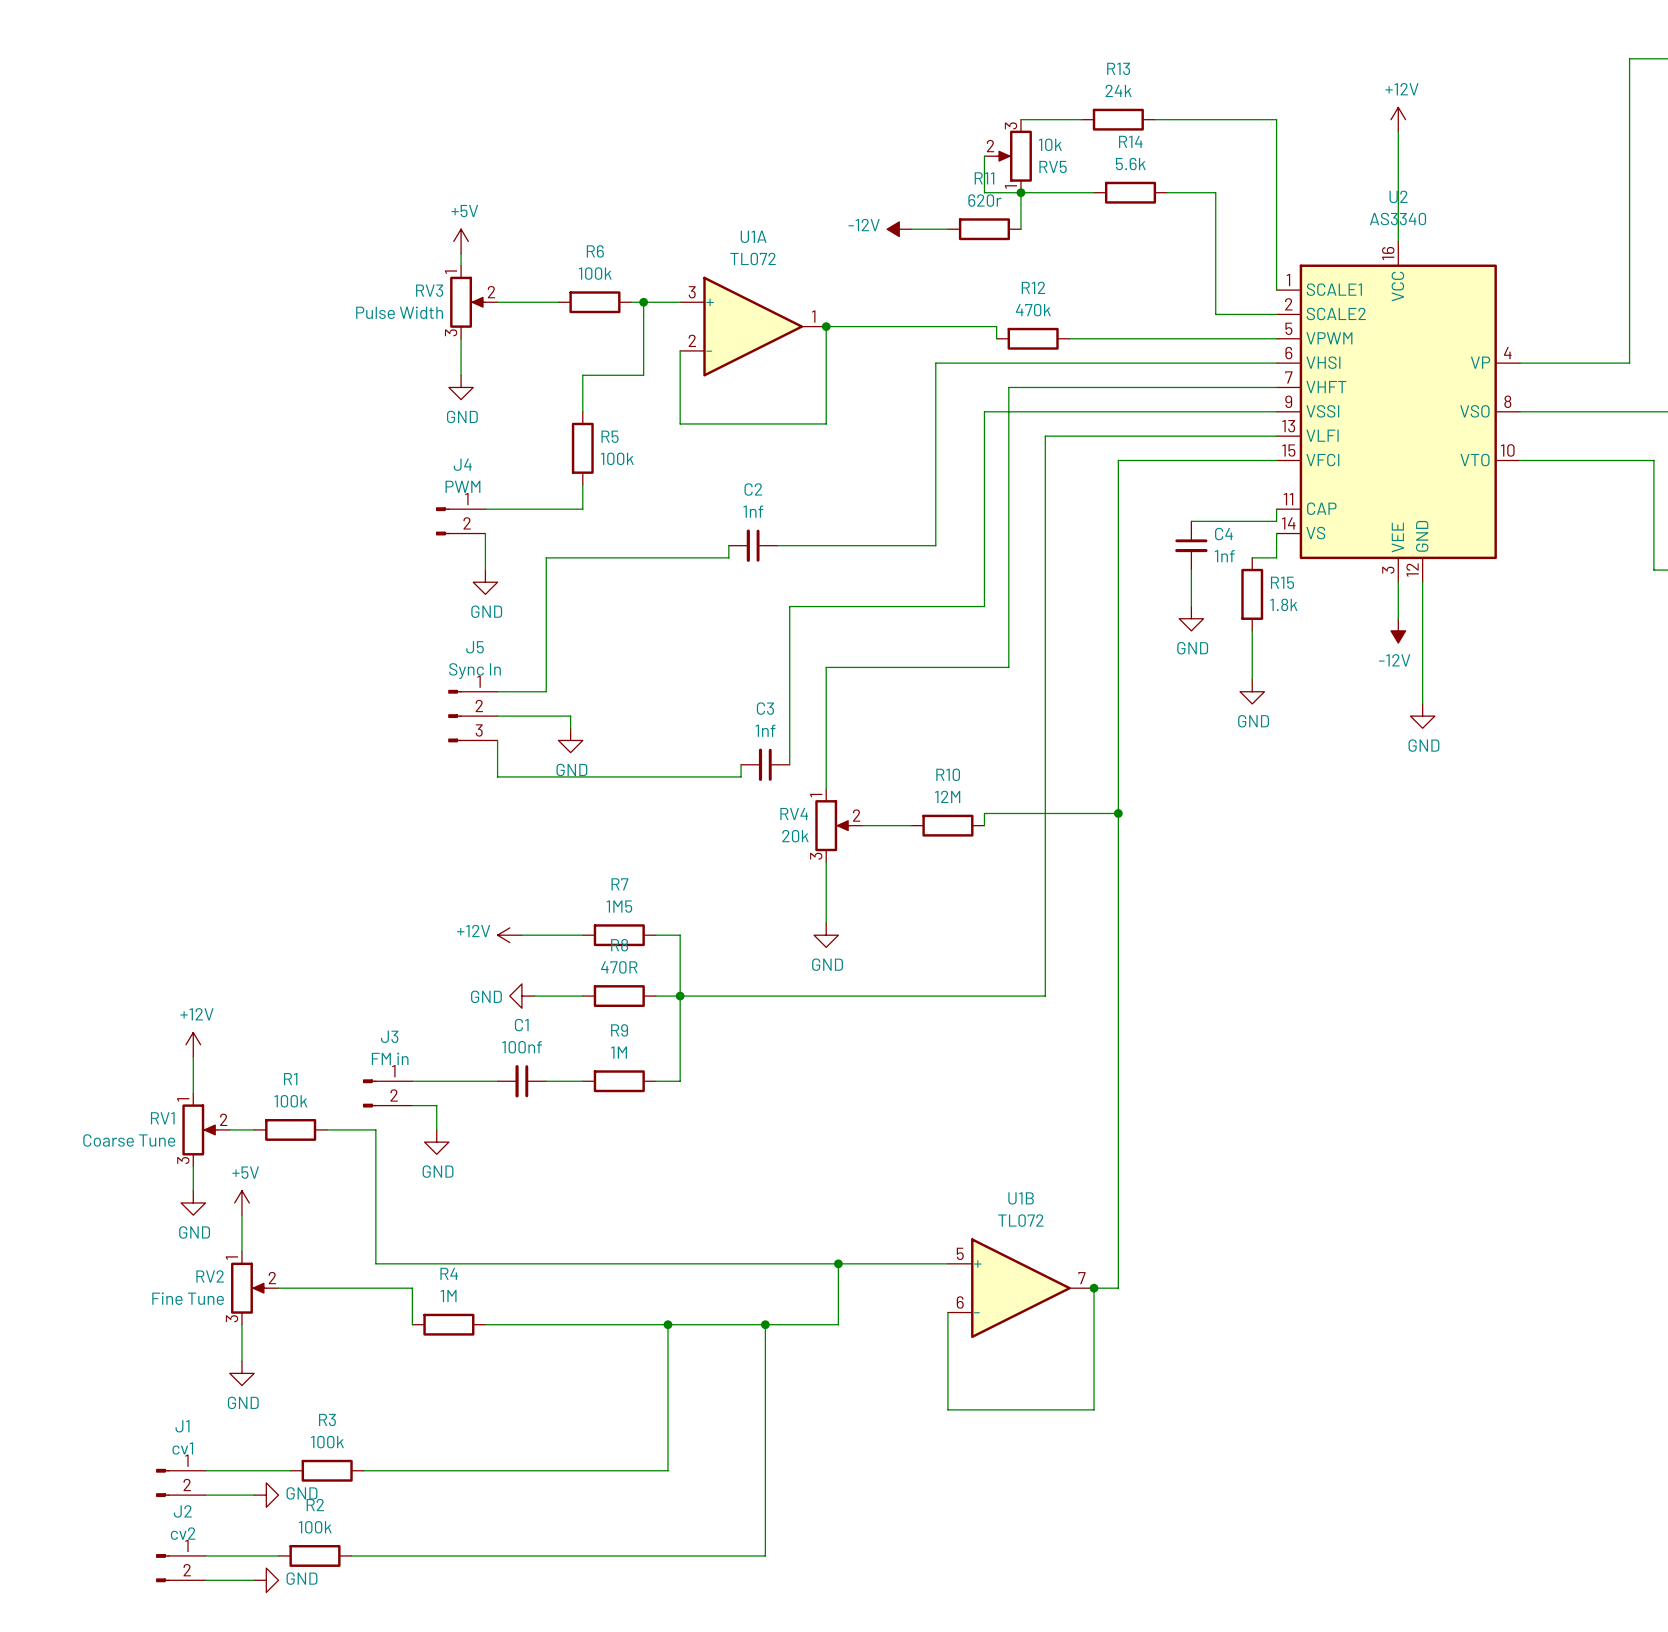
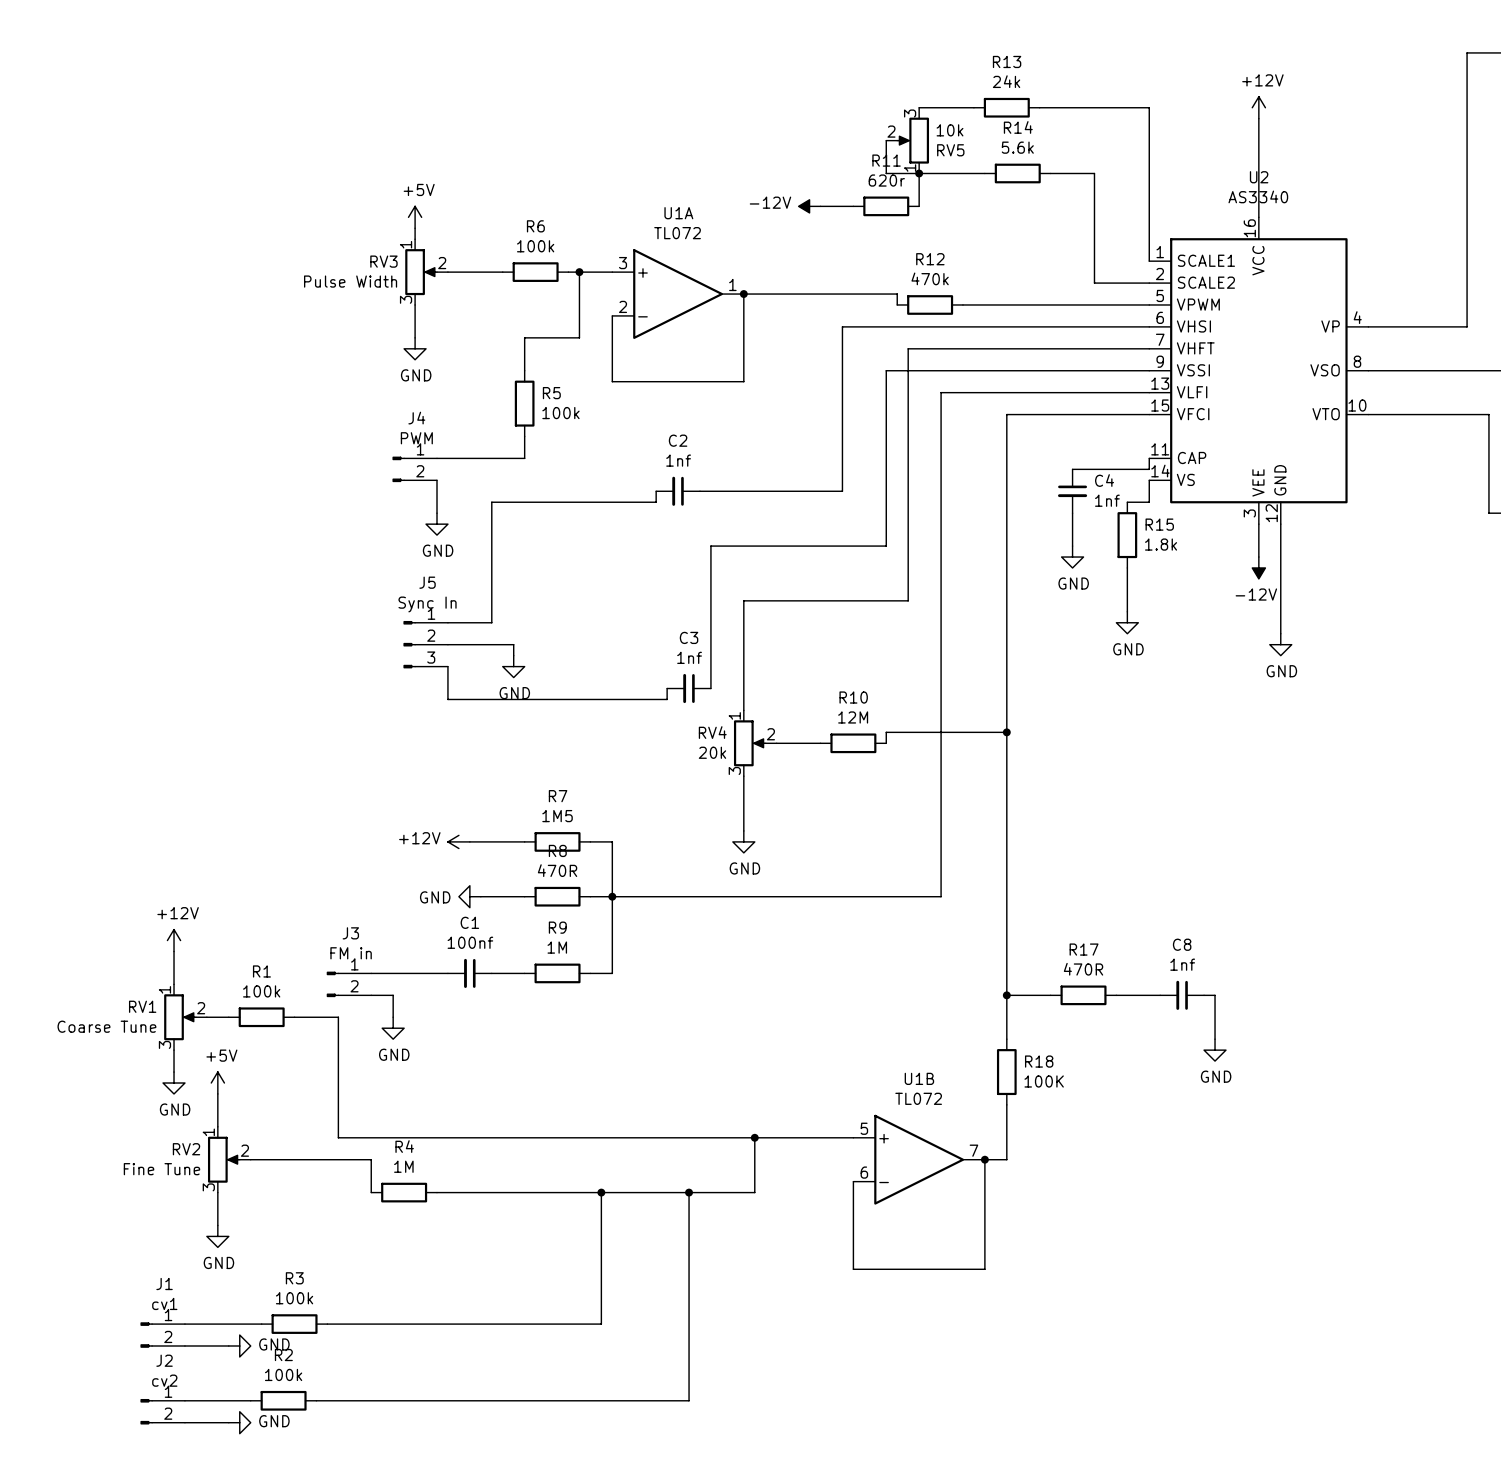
wire: none -> (1006, 995) (1050, 995)
junction: none -> (1006, 995)
R17: none -> 470R (1083, 995)
wire: none -> (1116, 995) (1160, 995)
C8: none -> 1nf (1182, 995)
wire: none -> (1204, 995) (1215, 995) (1215, 1039)
wire: (1118, 1154) (1118, 1227) -> none
power symbol: none -> GND (1215, 1050)
R18: none -> 100K (1006, 1072)

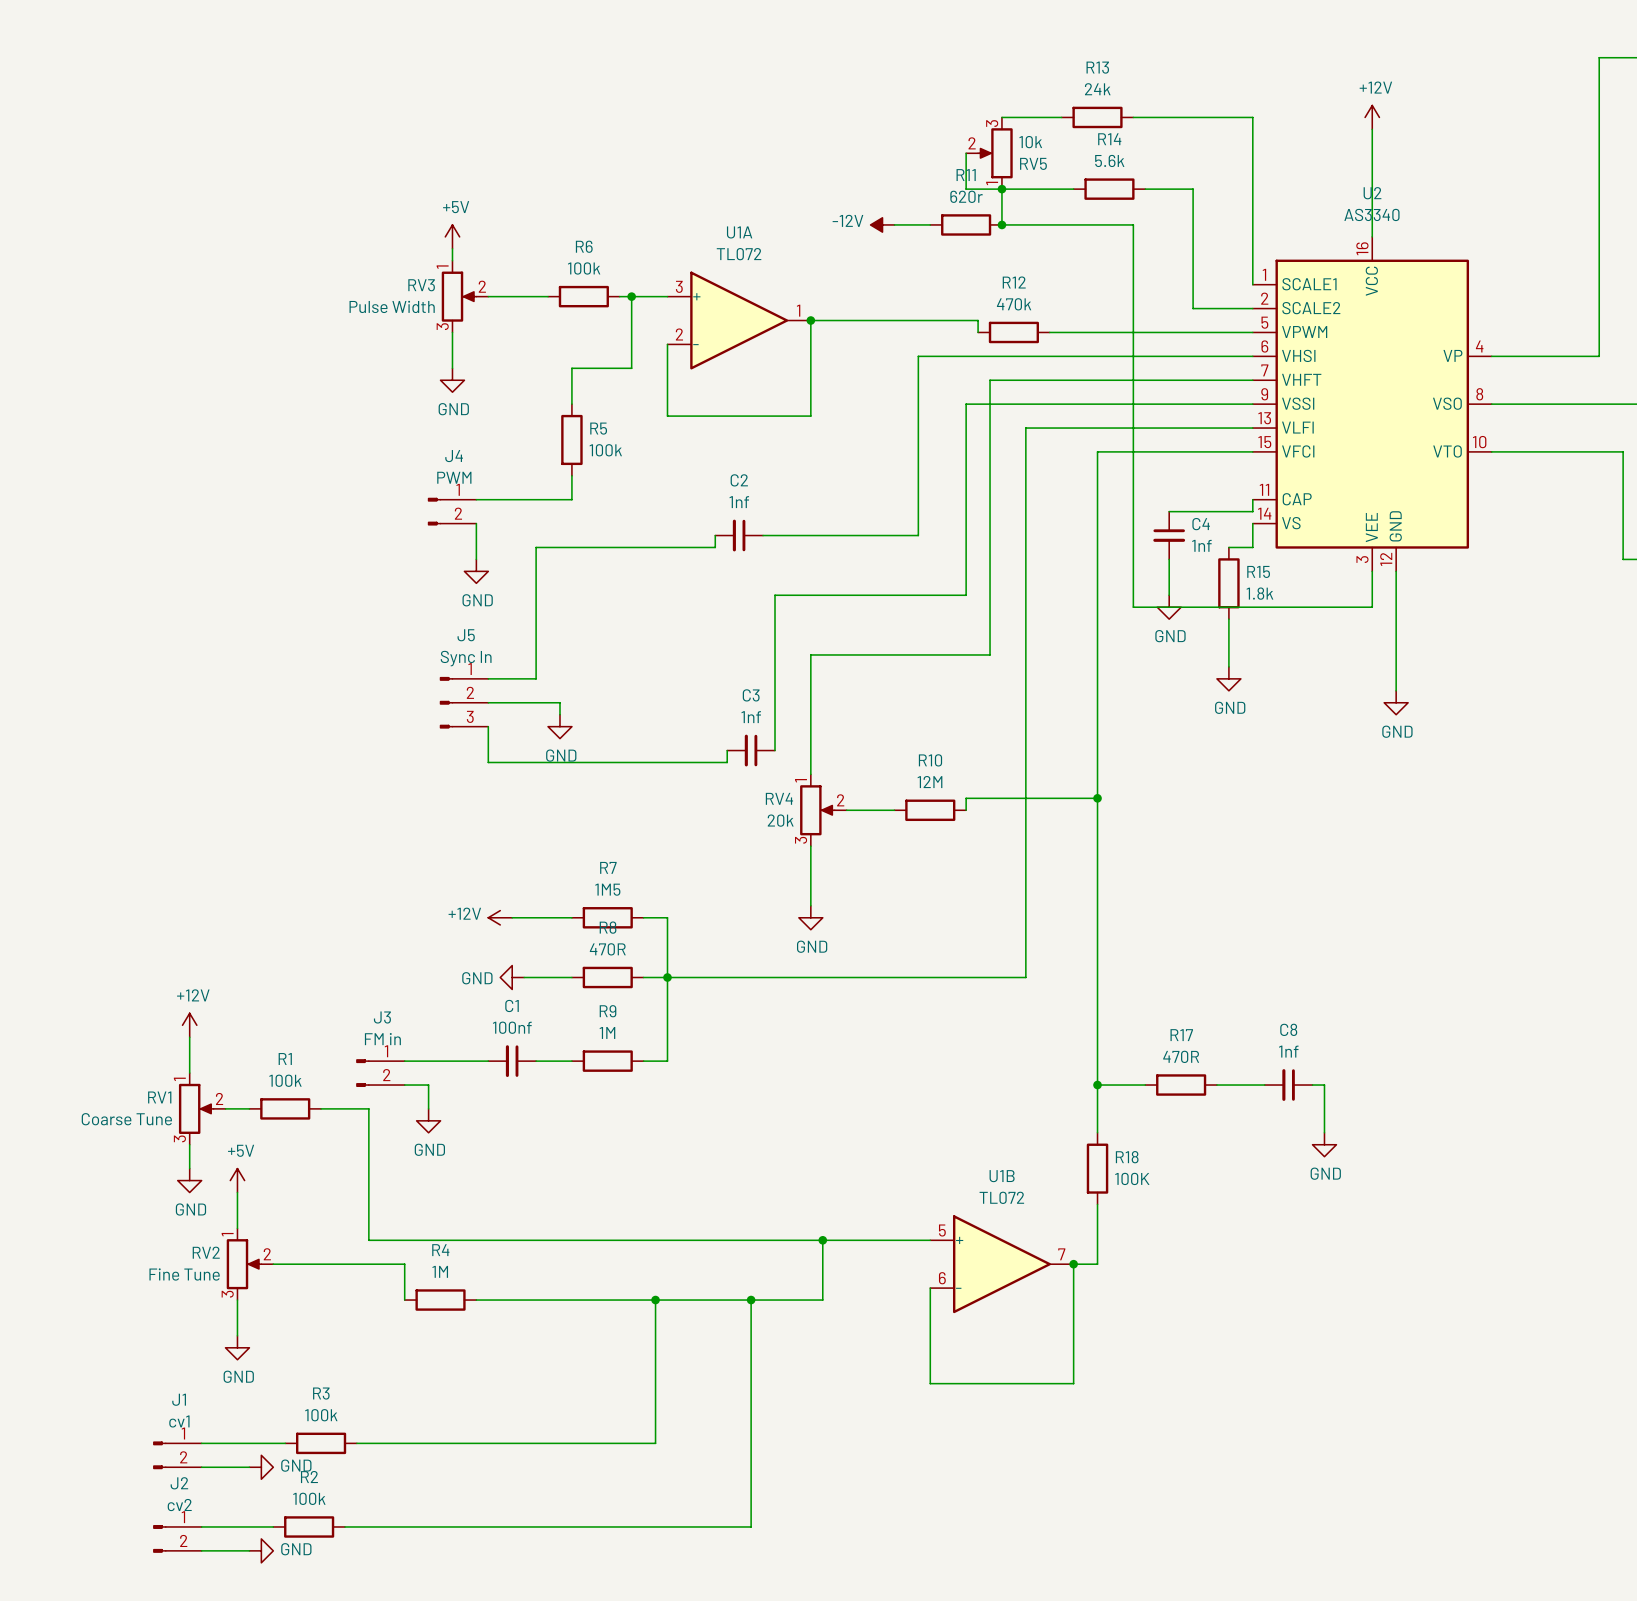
wire: none -> (1001, 224) (1133, 224) (1133, 607) (1372, 607)
junction: none -> (1001, 224)
power symbol: -12V (1258, 567) -> none

